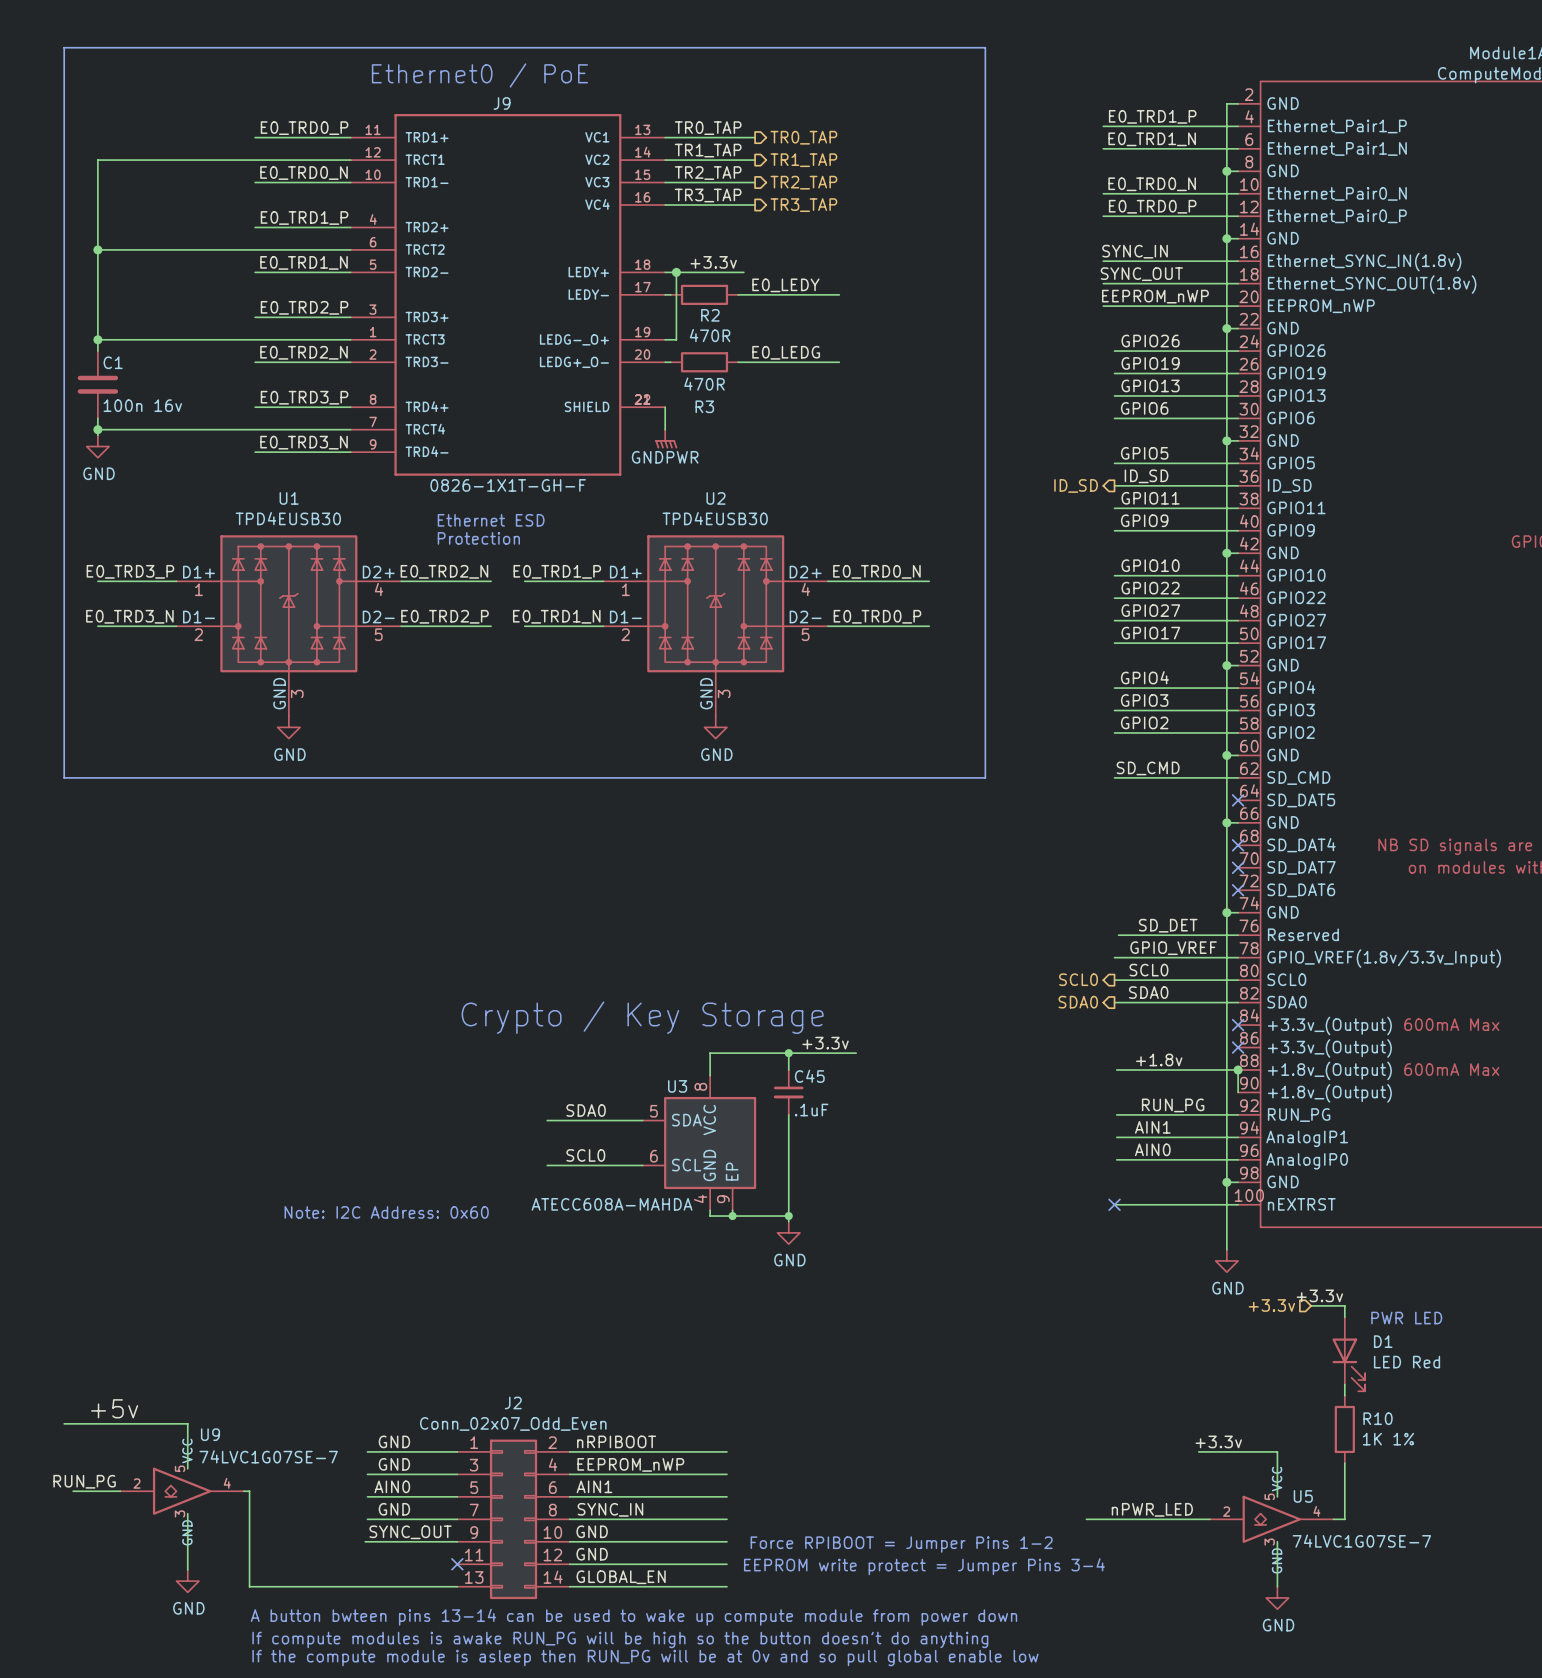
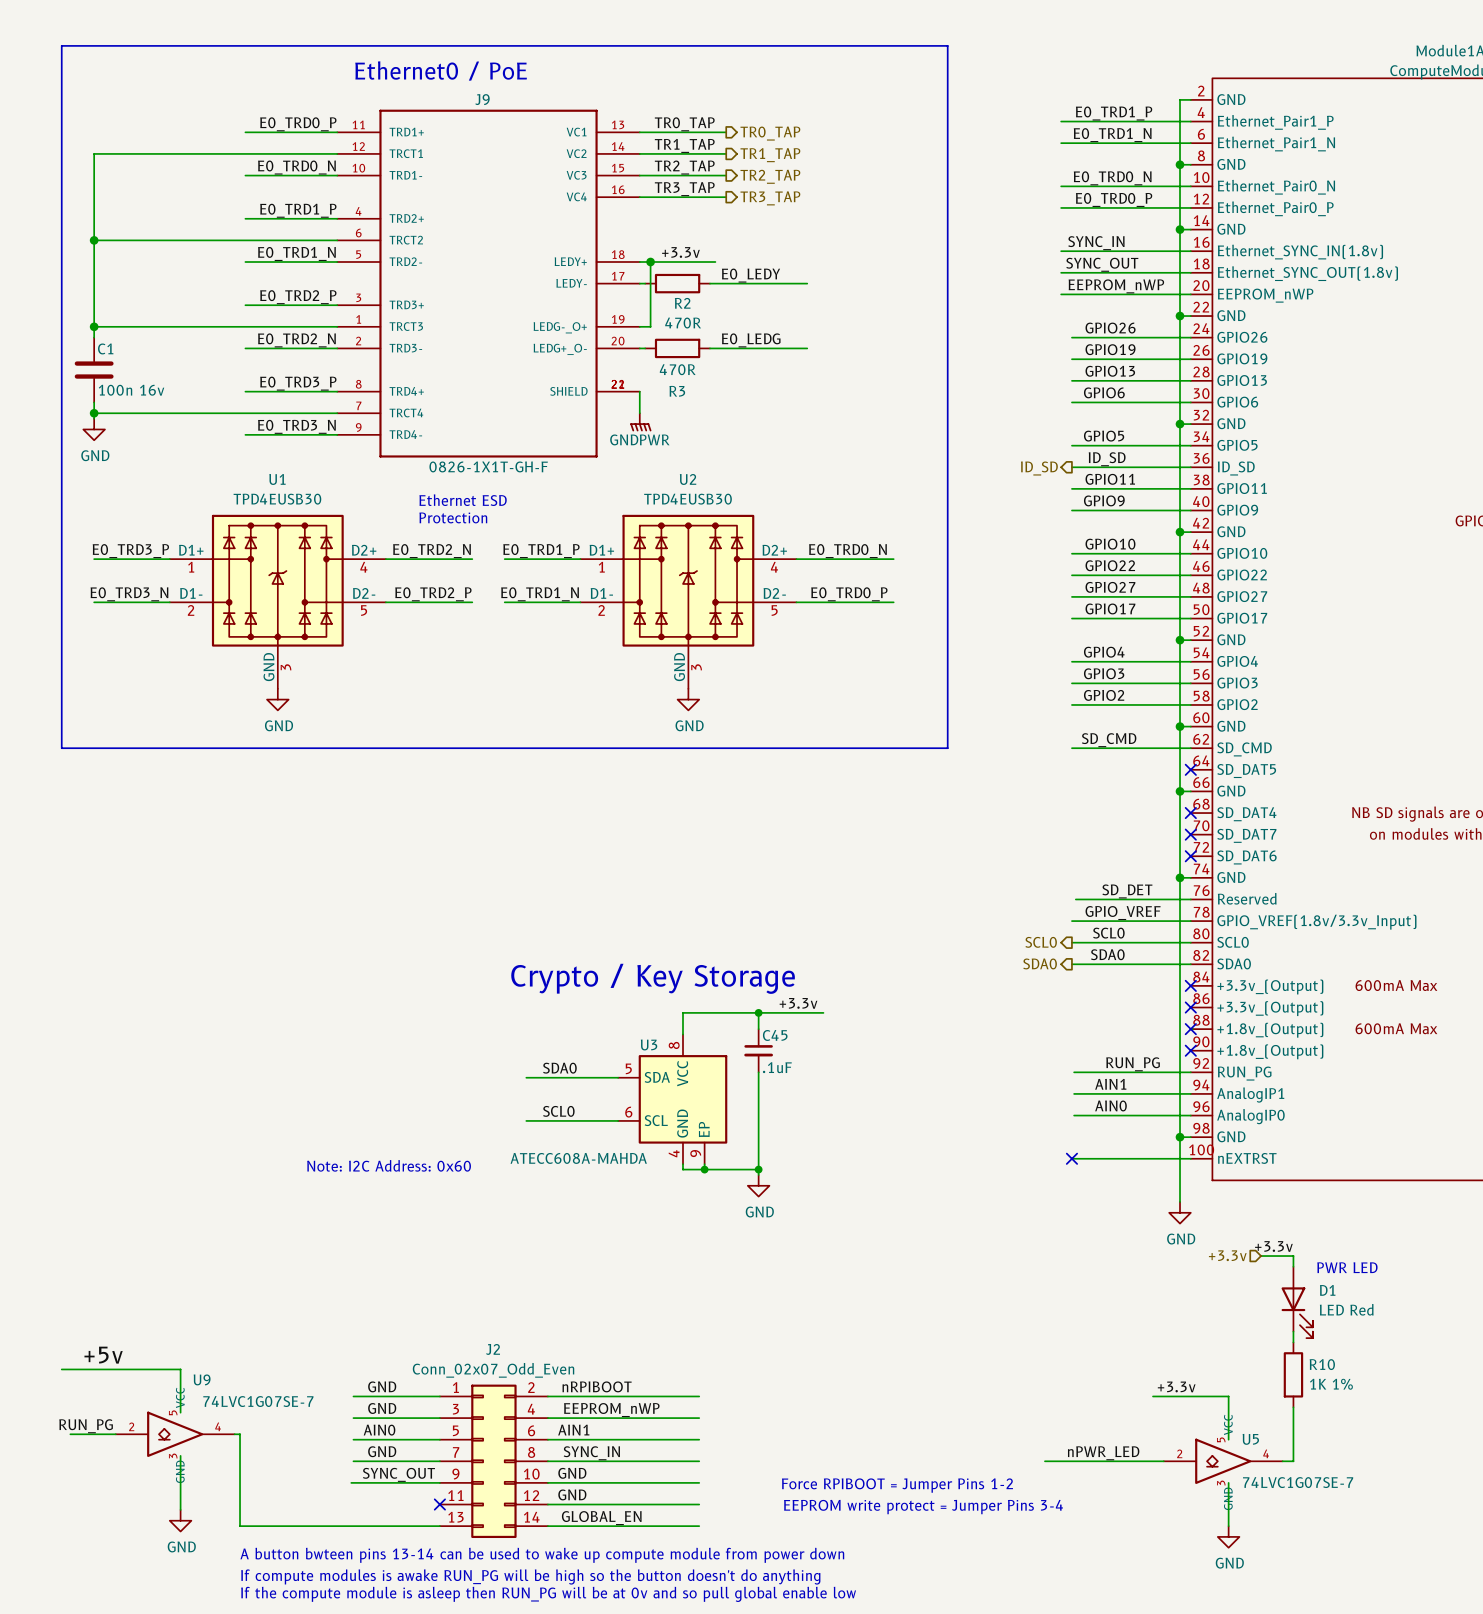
label: +1.8v (1159, 1059) -> none
wire: (1116, 1069) (1238, 1069) (1238, 1092) -> none
junction: (1238, 1069) -> none
no-connect mark: none -> (1190, 1029)
no-connect mark: none -> (1190, 1050)

